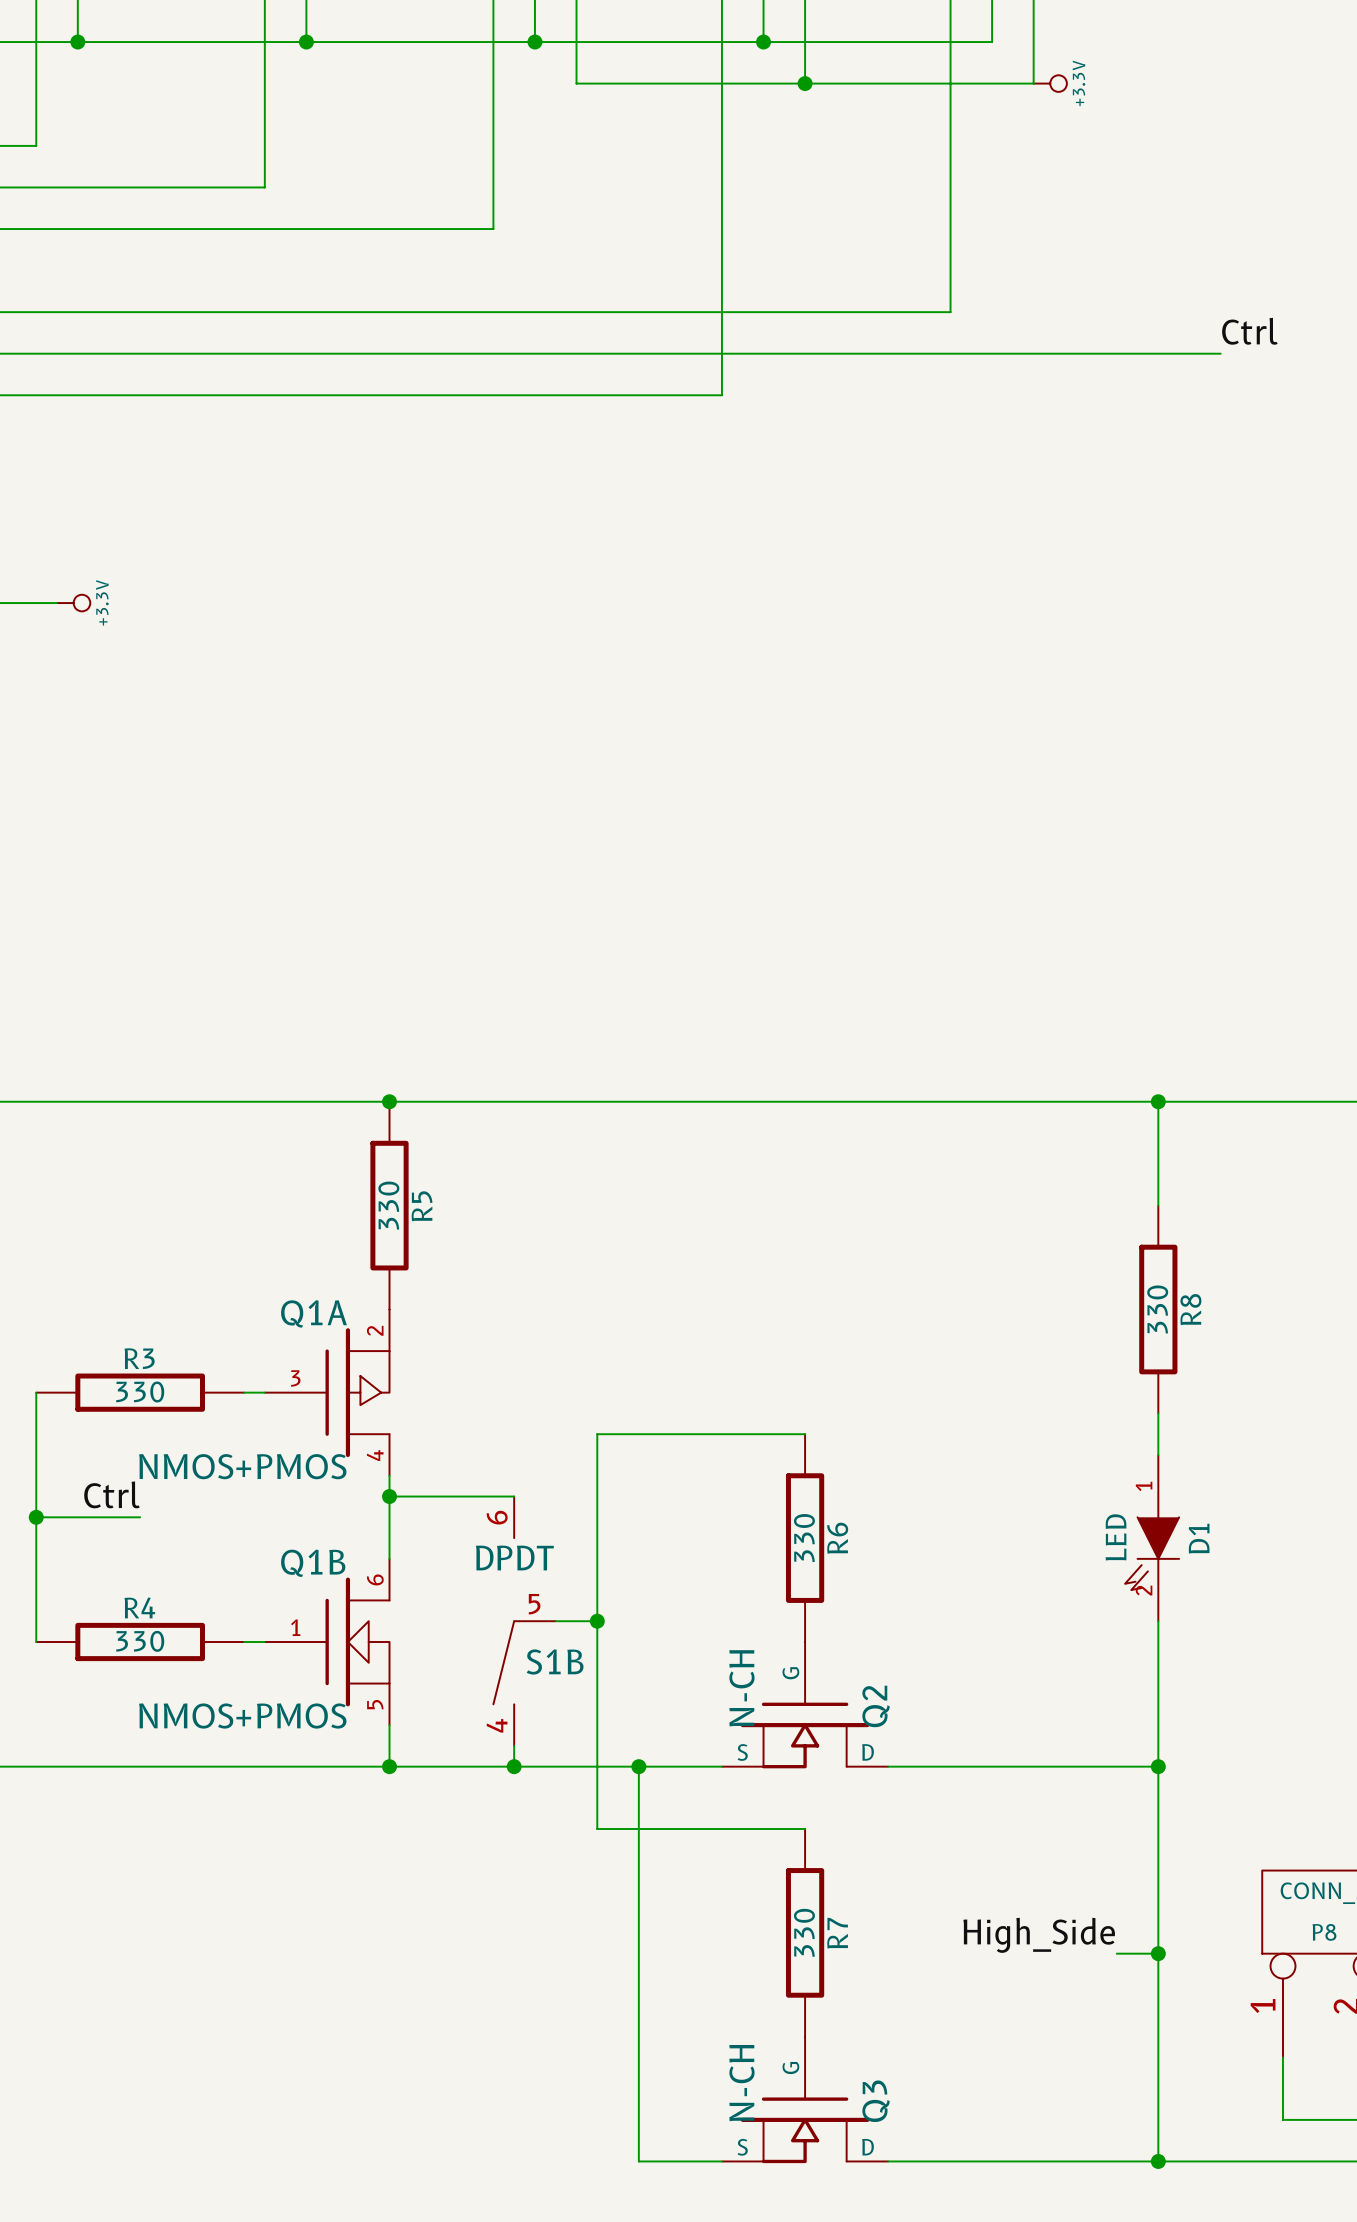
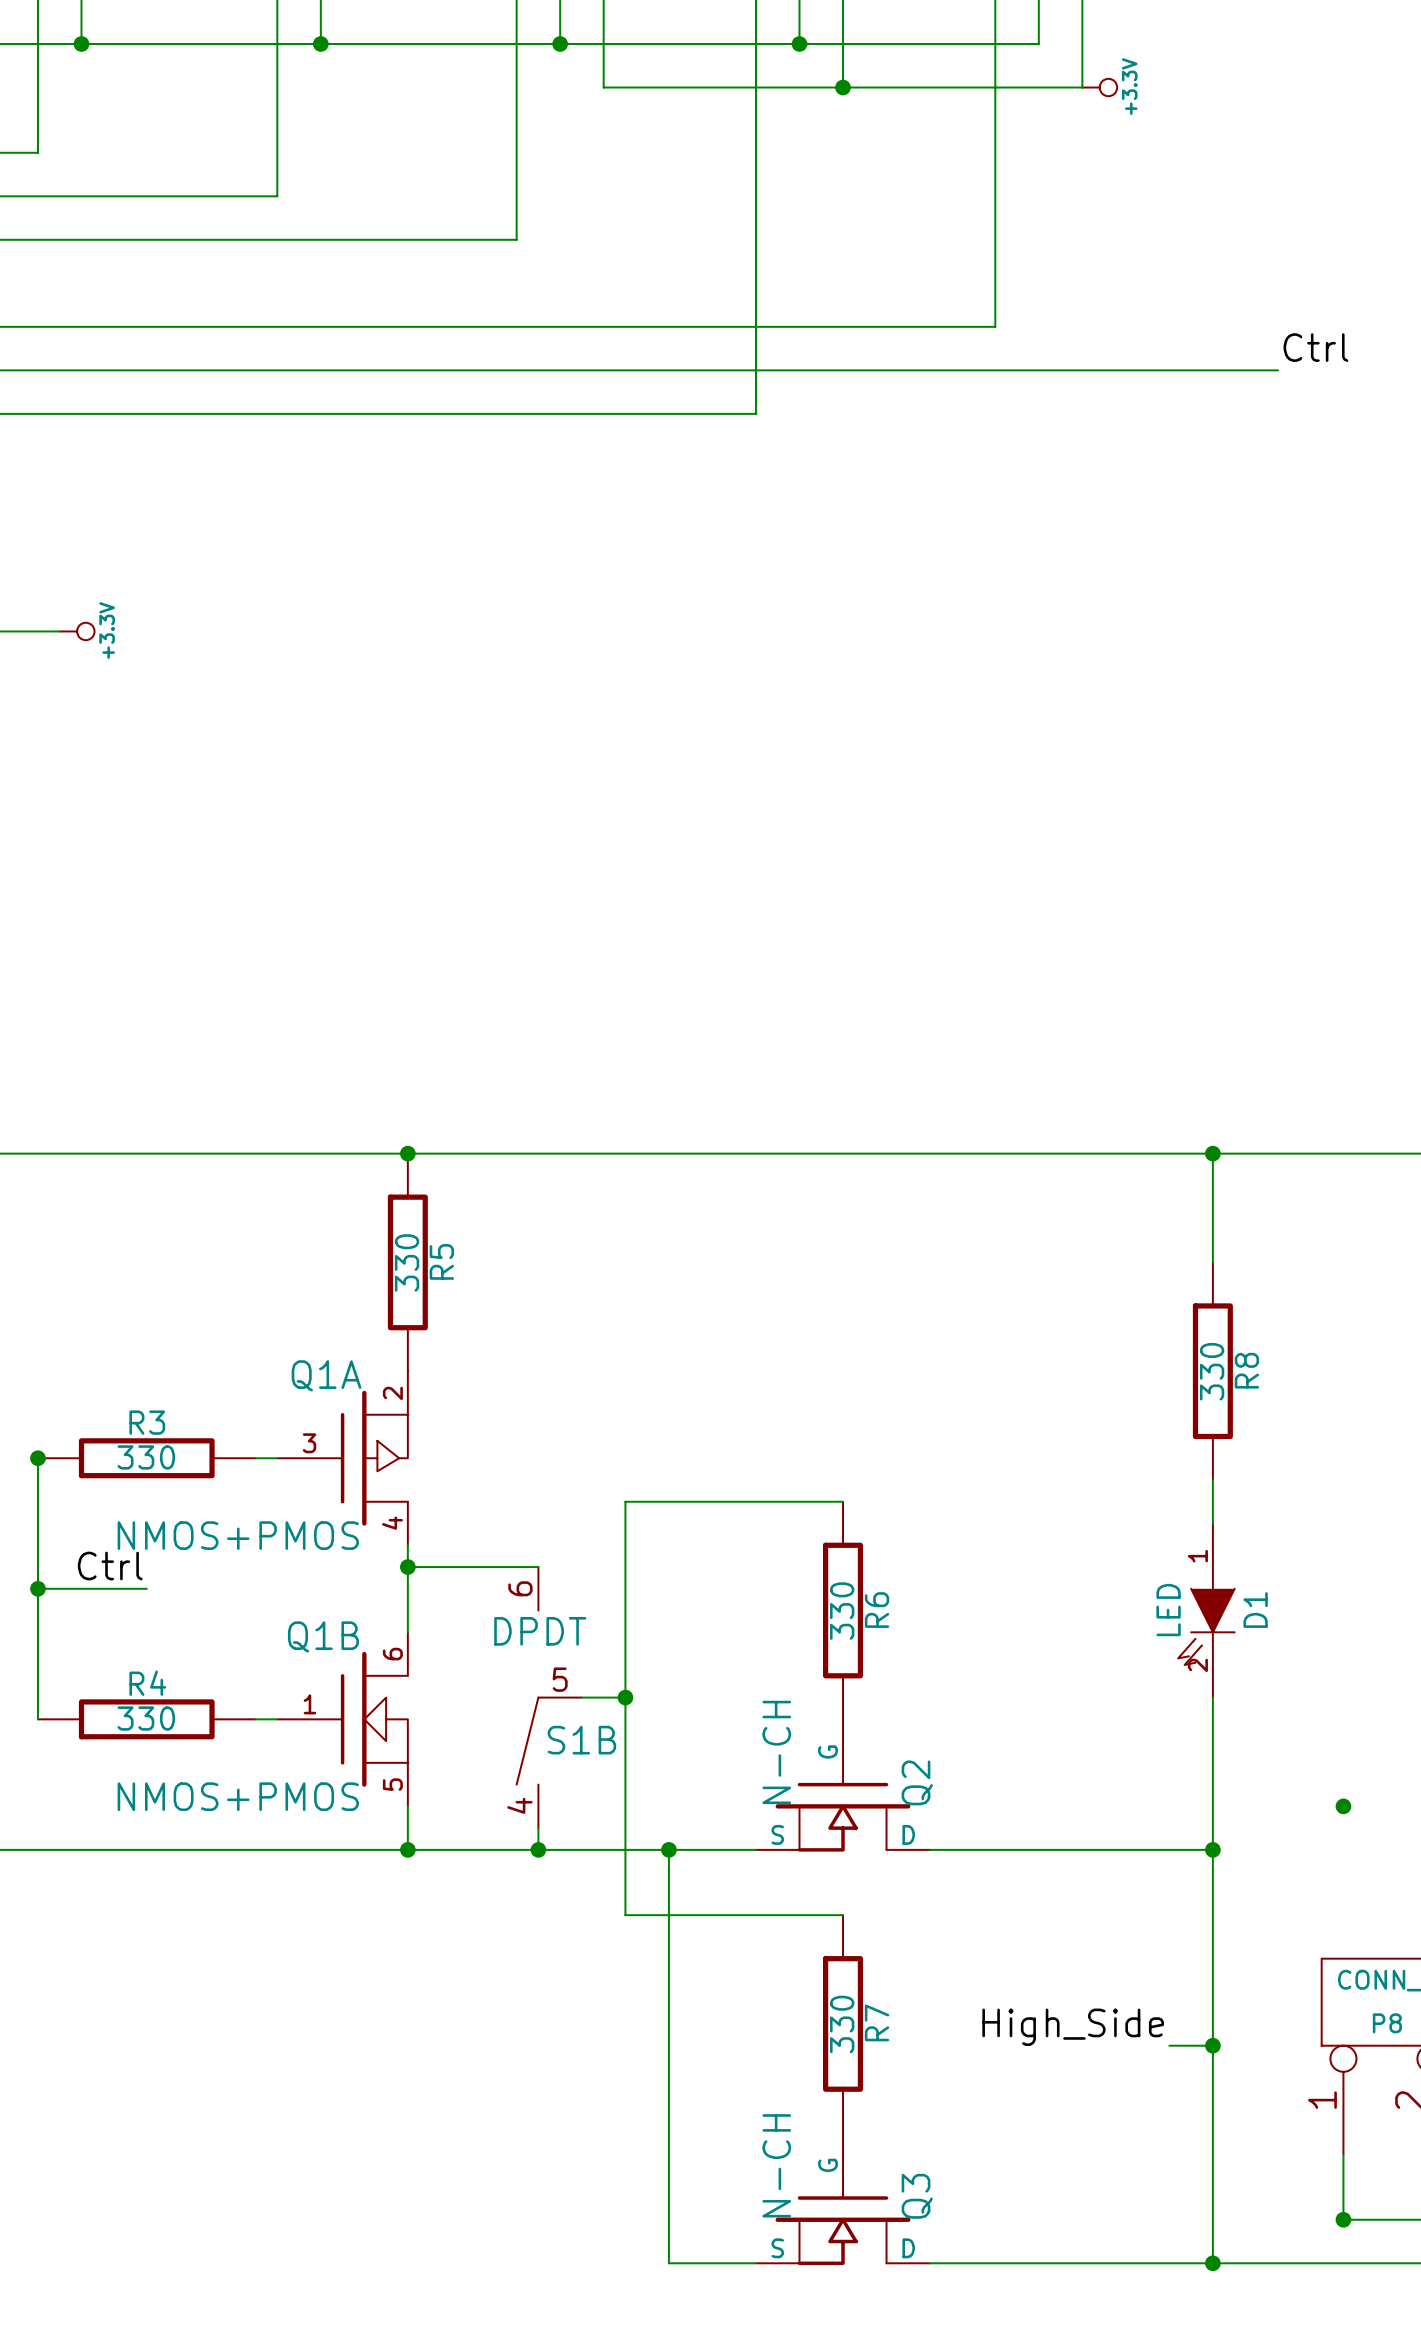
junction: none -> (37, 1458)
junction: none -> (1343, 1806)
junction: none -> (1343, 2219)

